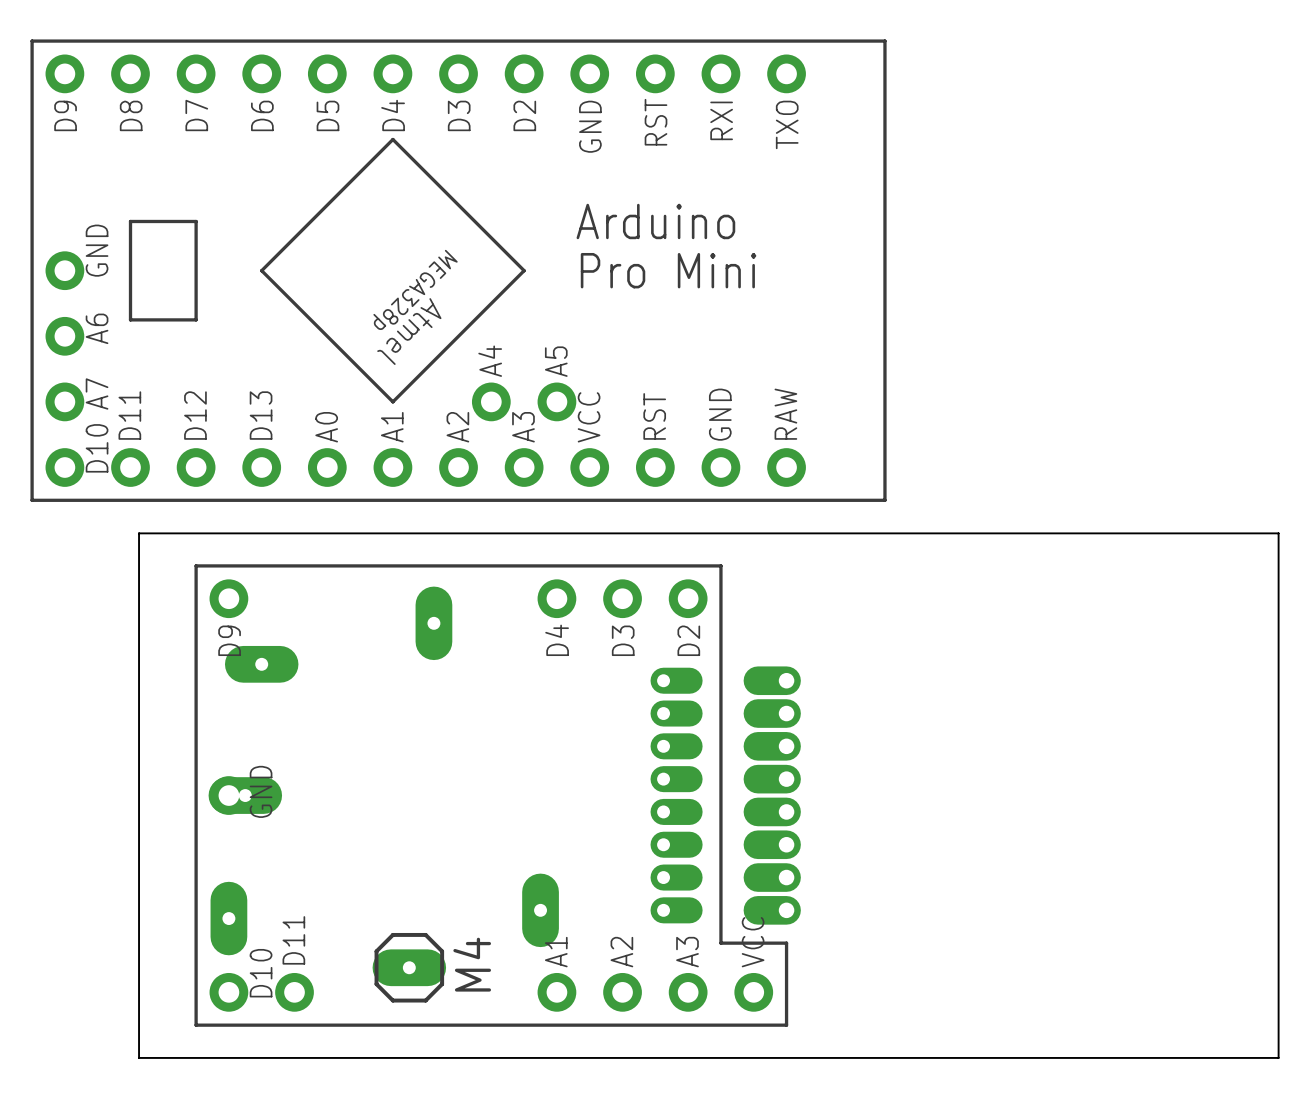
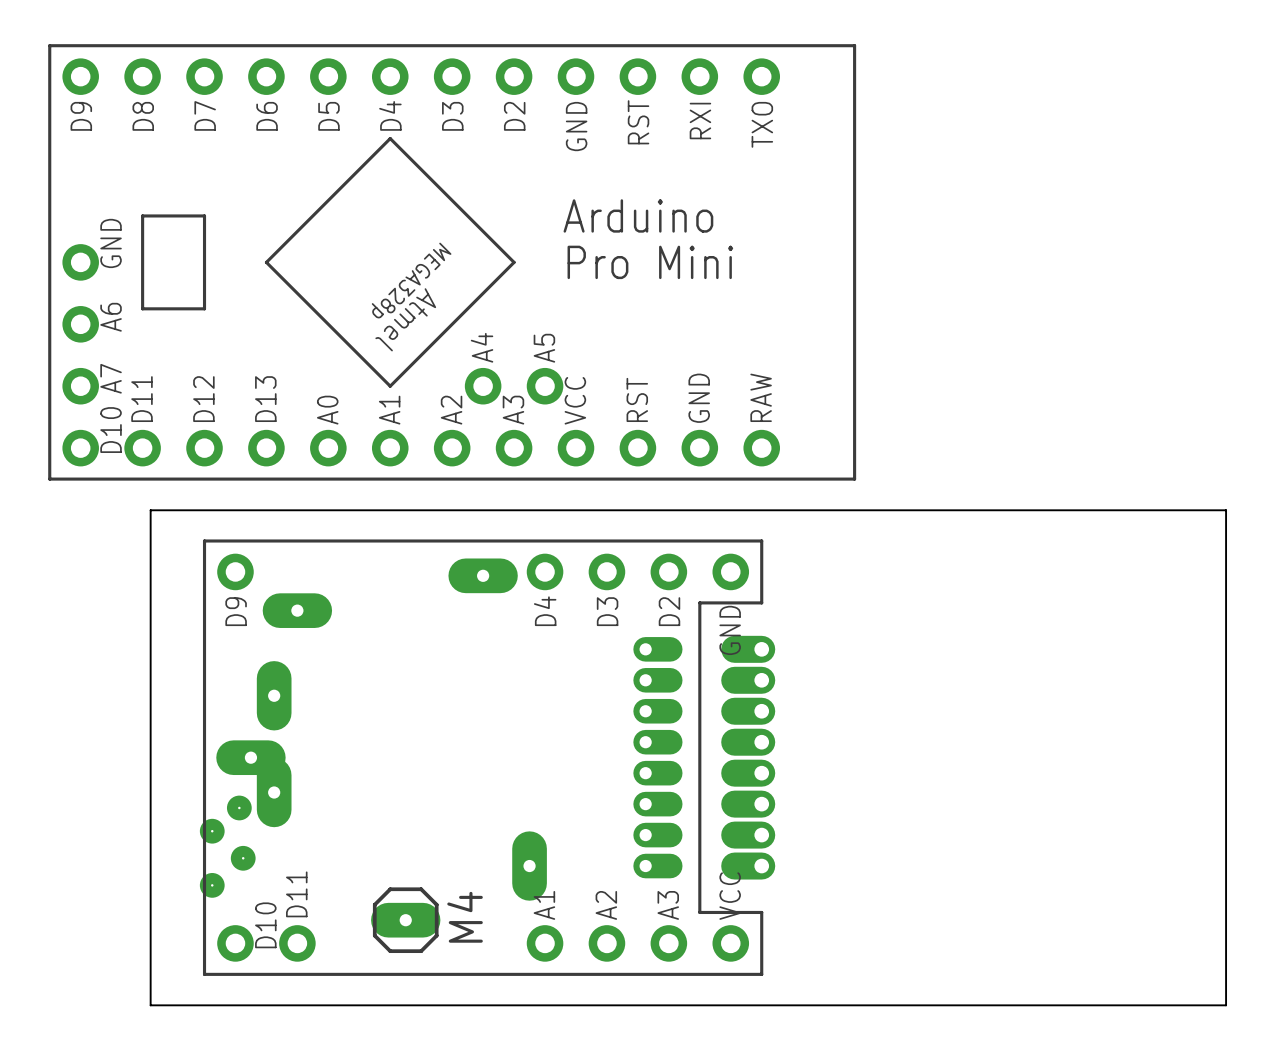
part footprint: [194, 564, 789, 1027] -> [202, 539, 764, 976]
part rotation: 0° (433, 623) -> 90° clockwise (483, 575)
part position: (433, 623) -> (483, 575)
part: none -> (297, 610)
part: (261, 664) -> none
part: none -> (274, 695)
part: none -> (274, 792)
via: none -> (239, 807)
via: none -> (212, 831)
via: none -> (243, 858)
part: (228, 918) -> none
via: none -> (212, 885)

